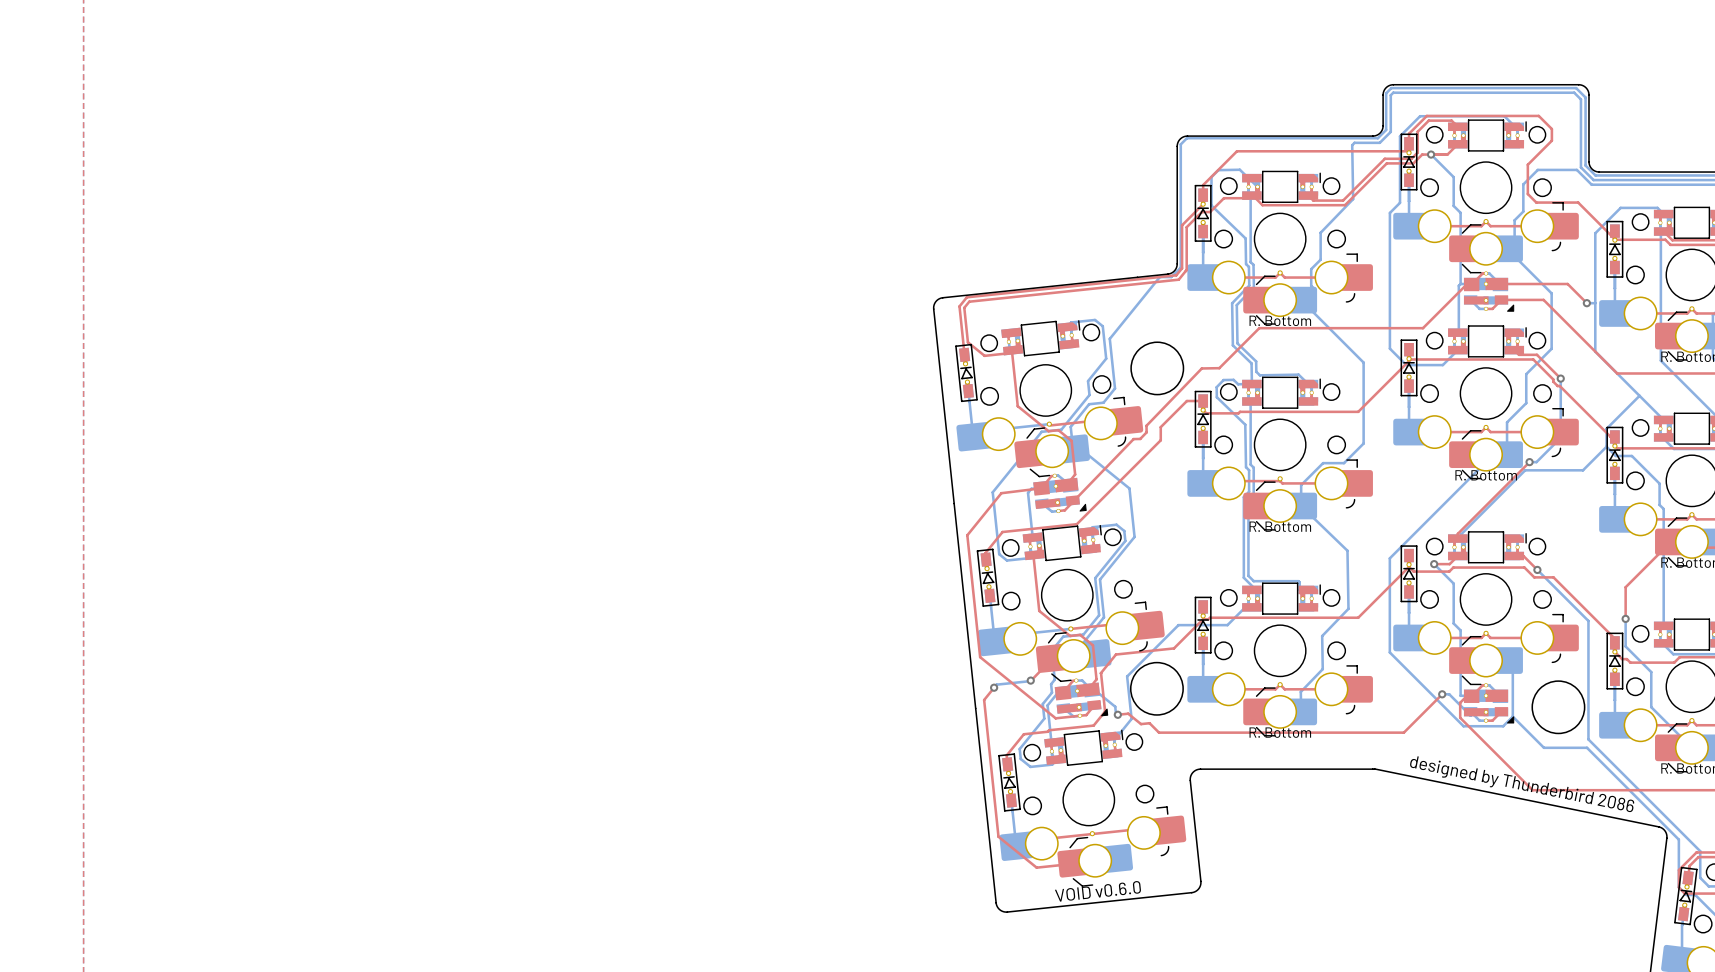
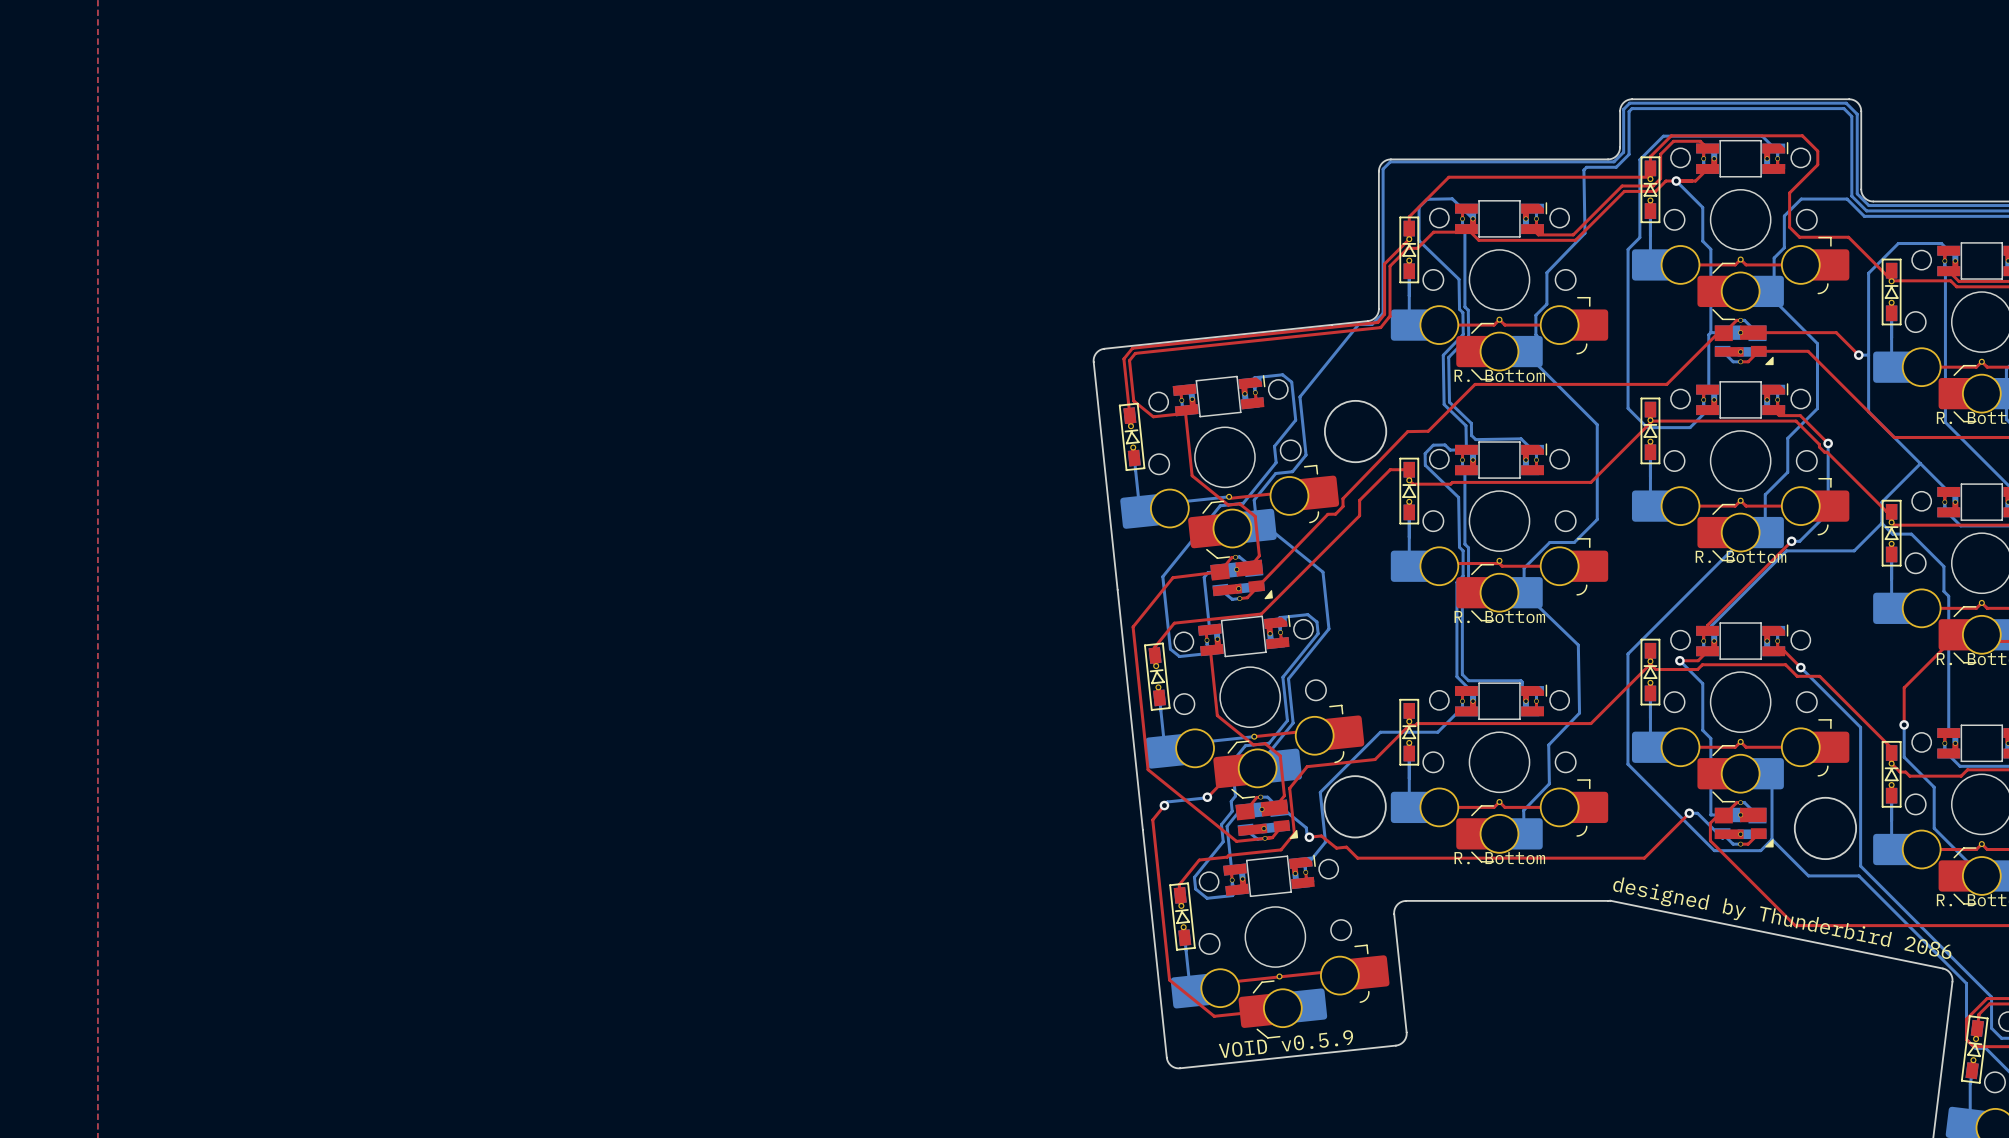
text: VOID v0.6.0 (1098, 891) -> VOID v0.5.9 (1285, 1044)

